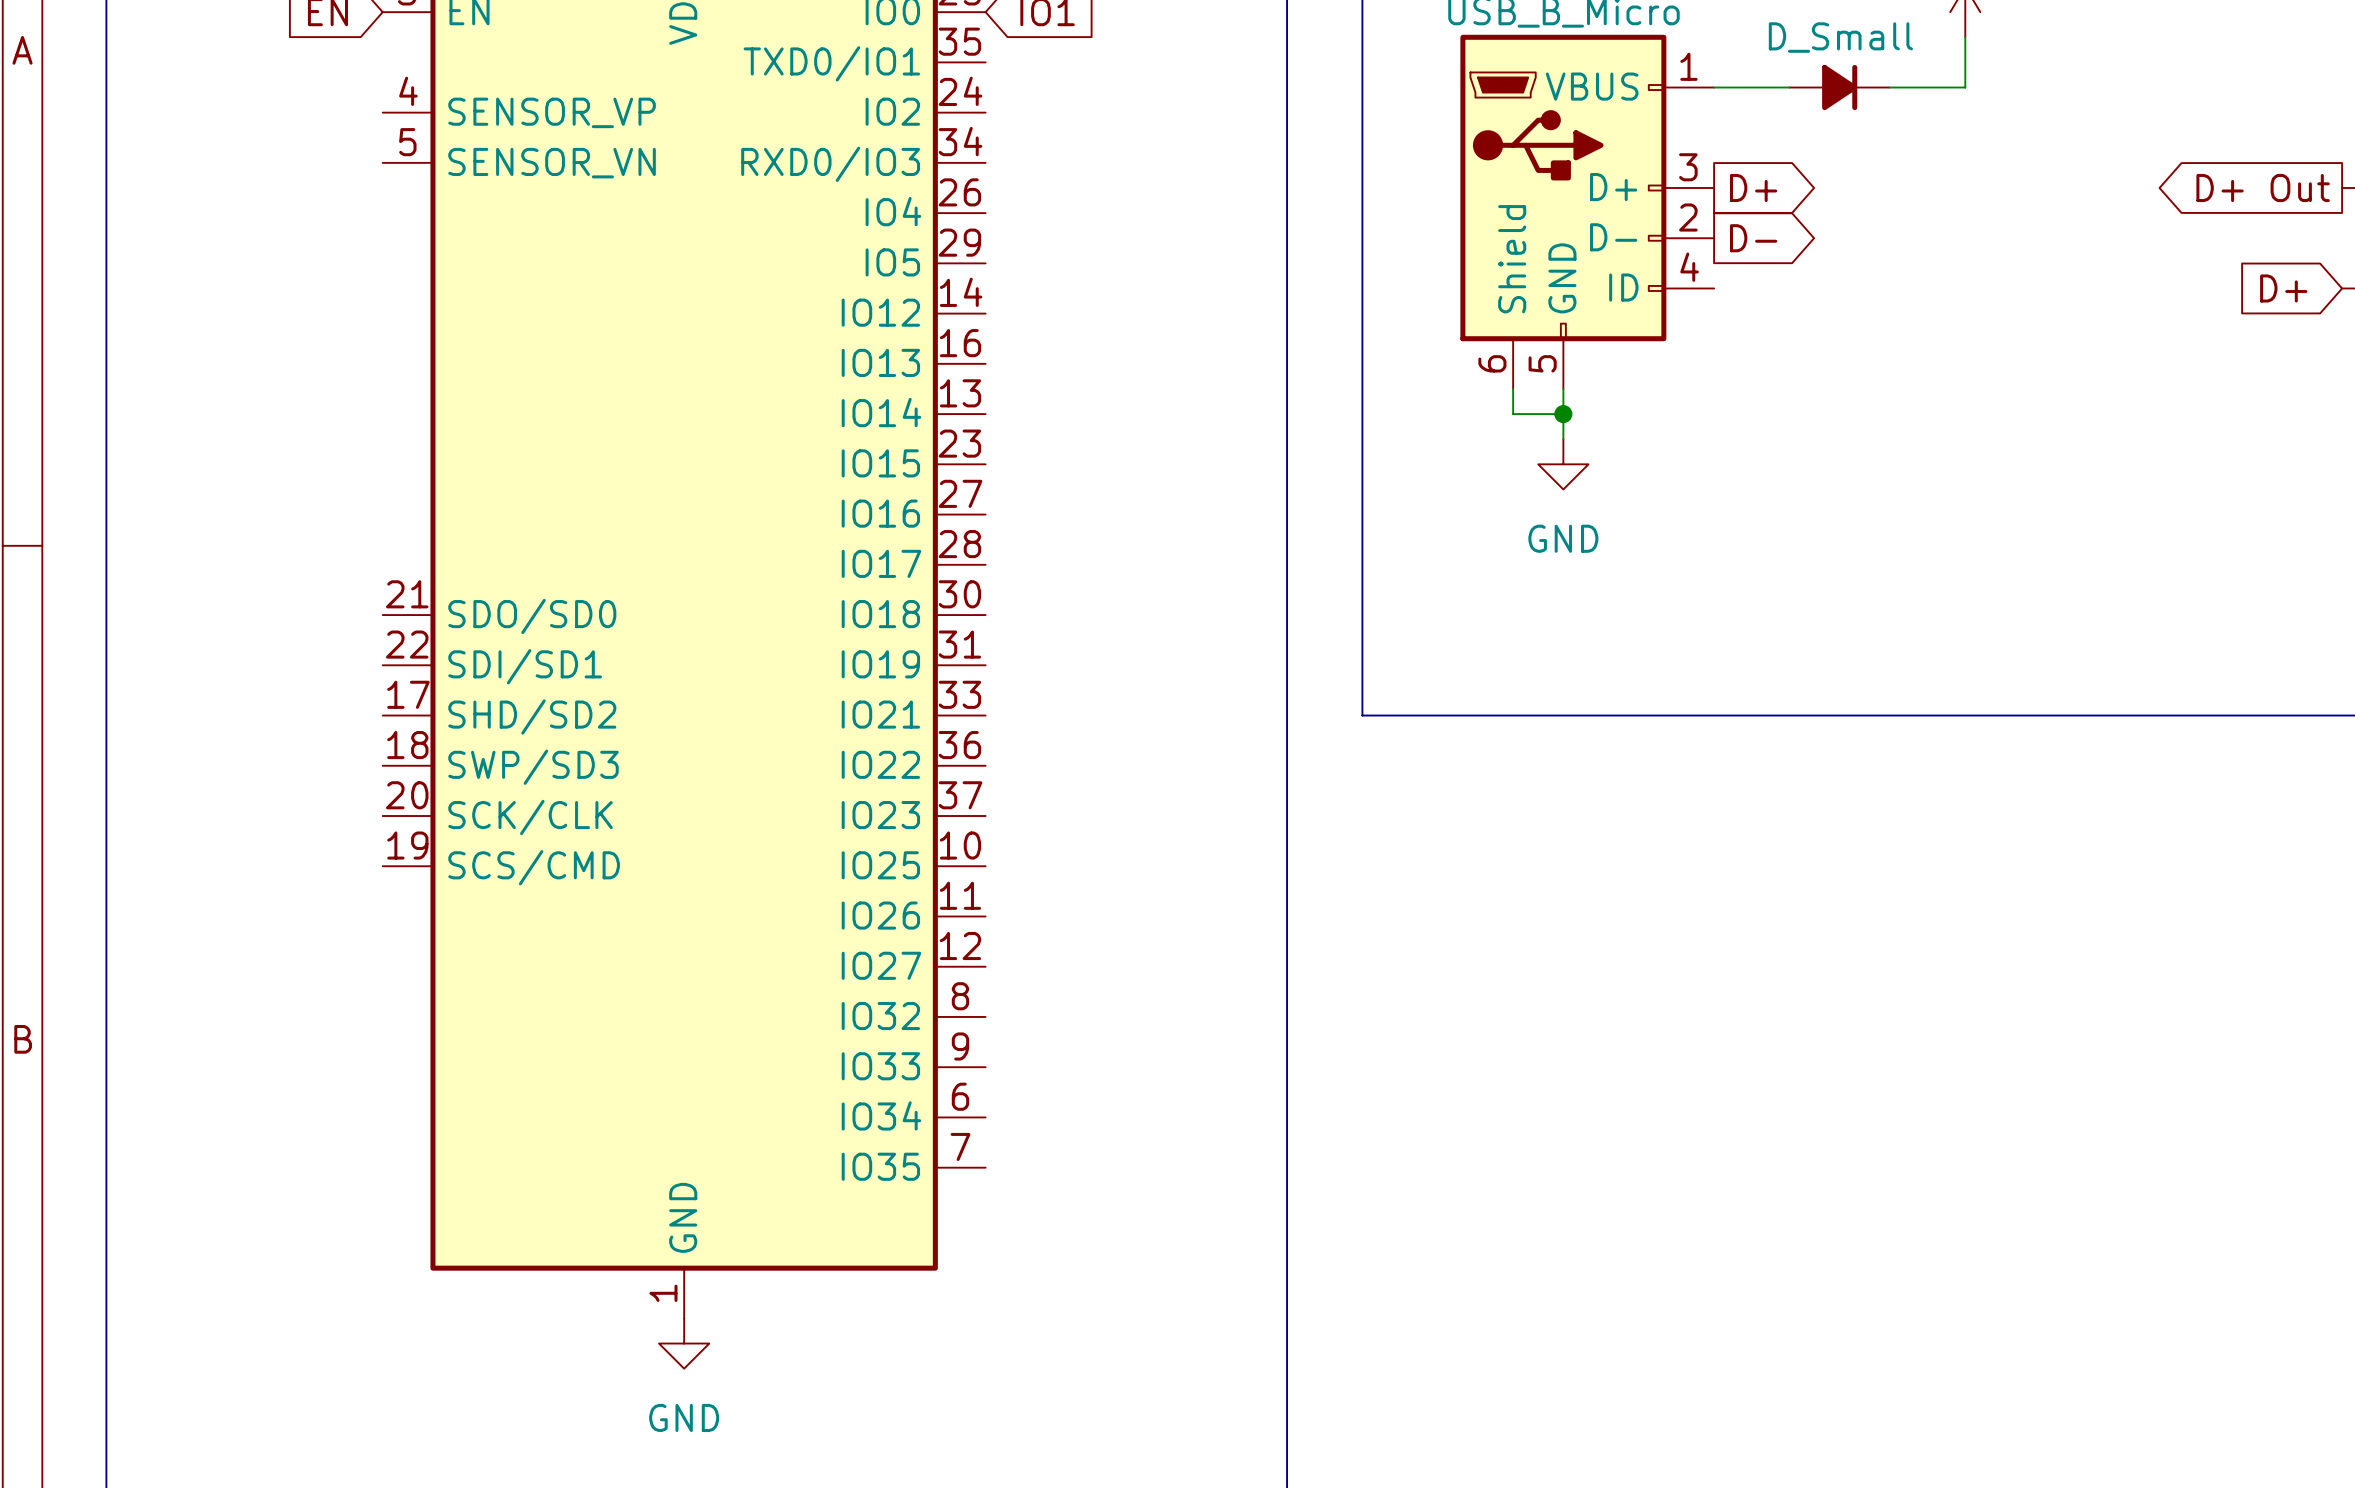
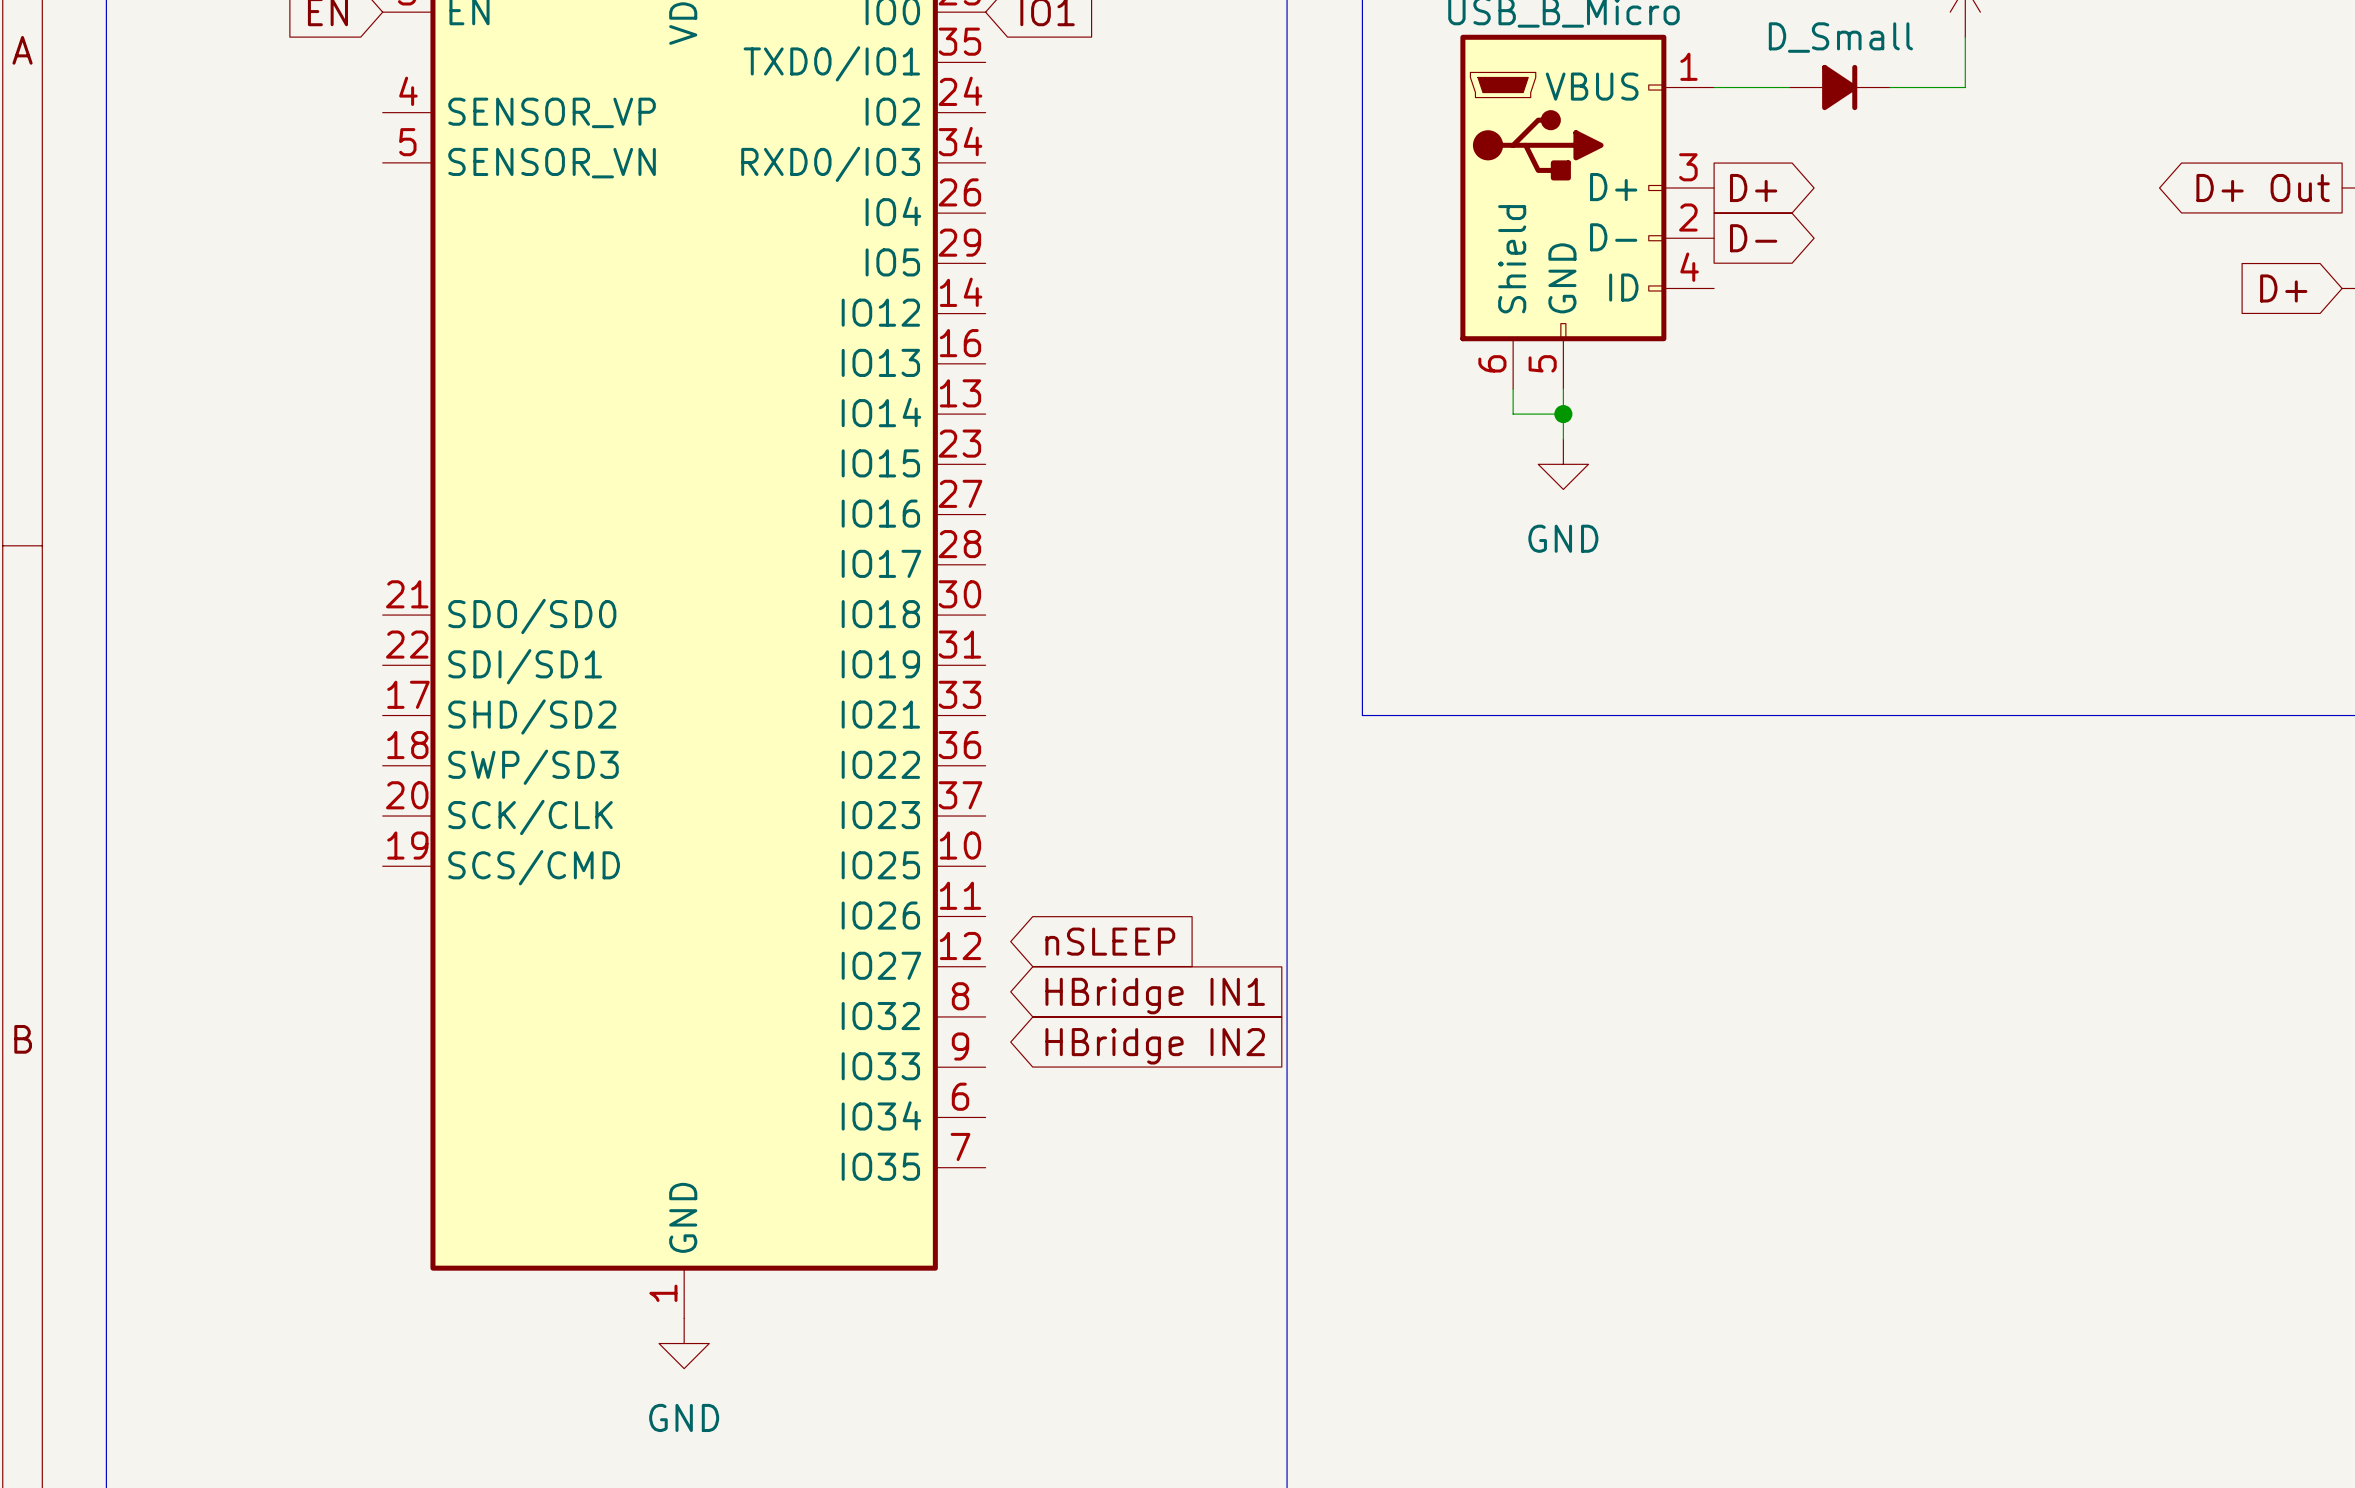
global label: none -> nSLEEP (1110, 941)
global label: none -> HBridge IN1 (1155, 996)
global label: none -> HBridge IN2 (1155, 1046)

